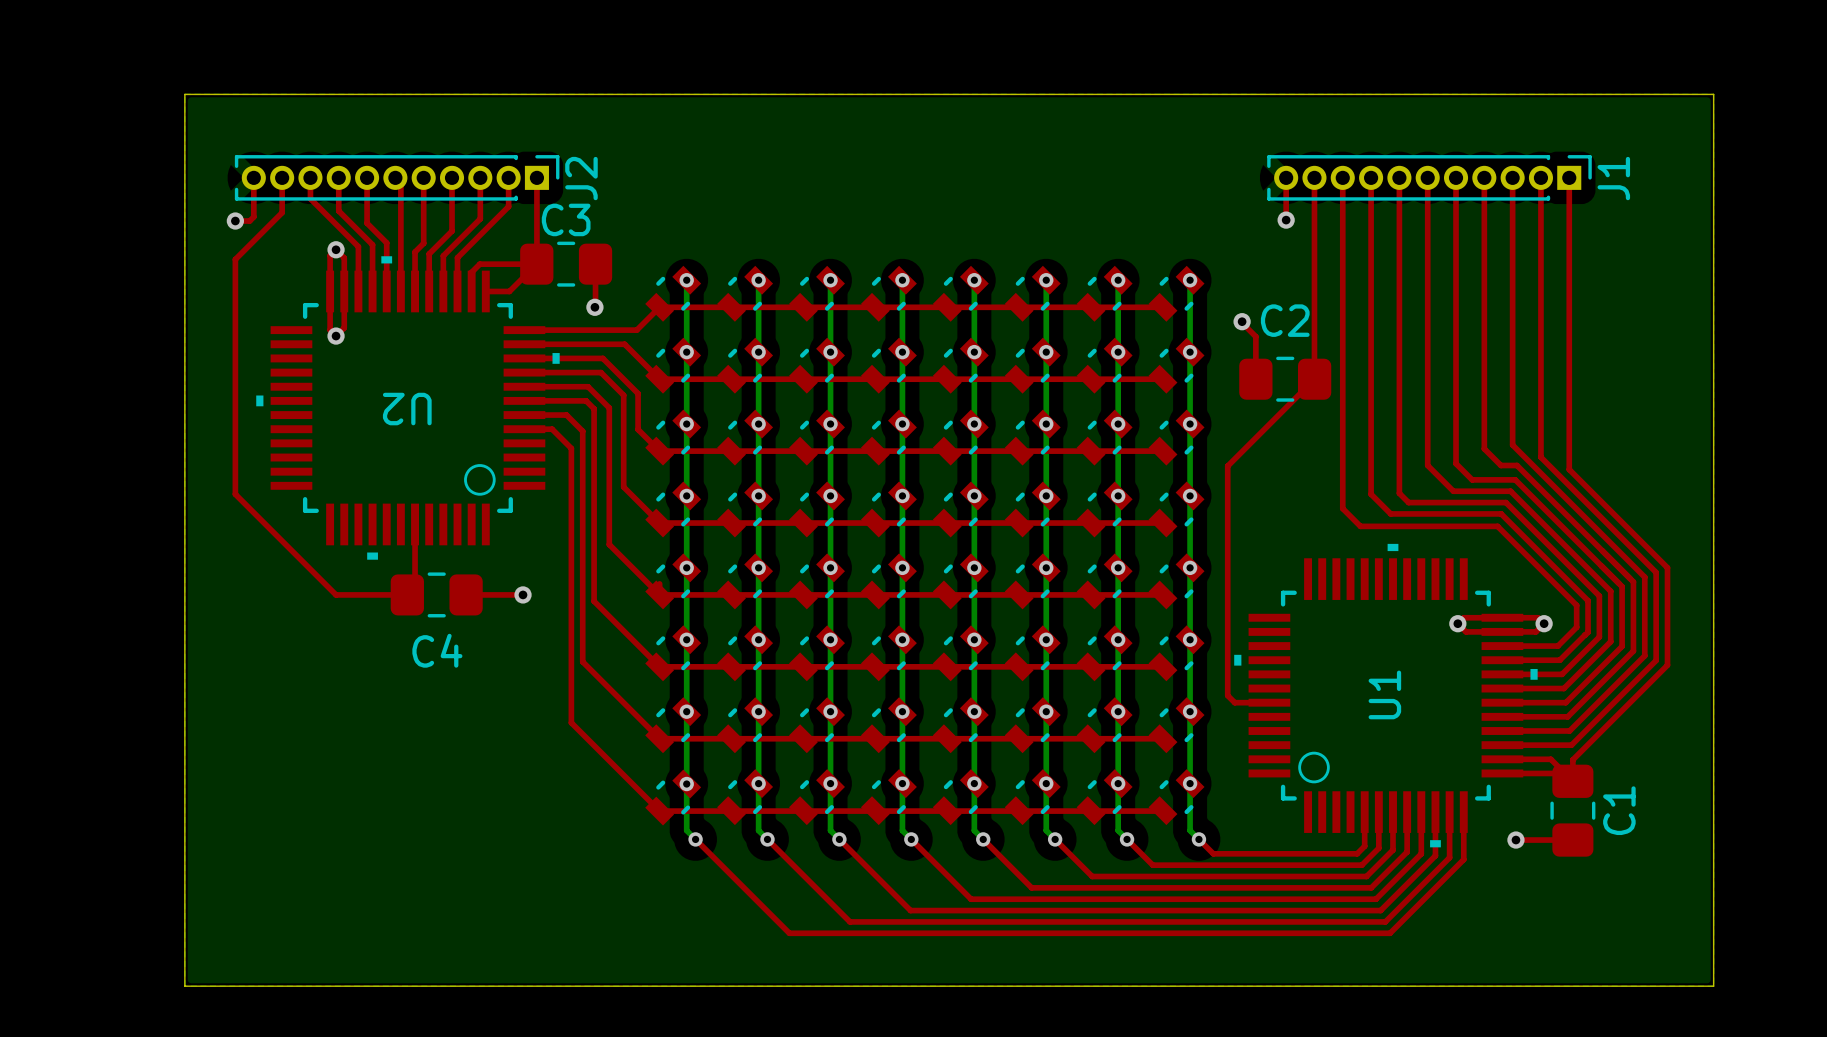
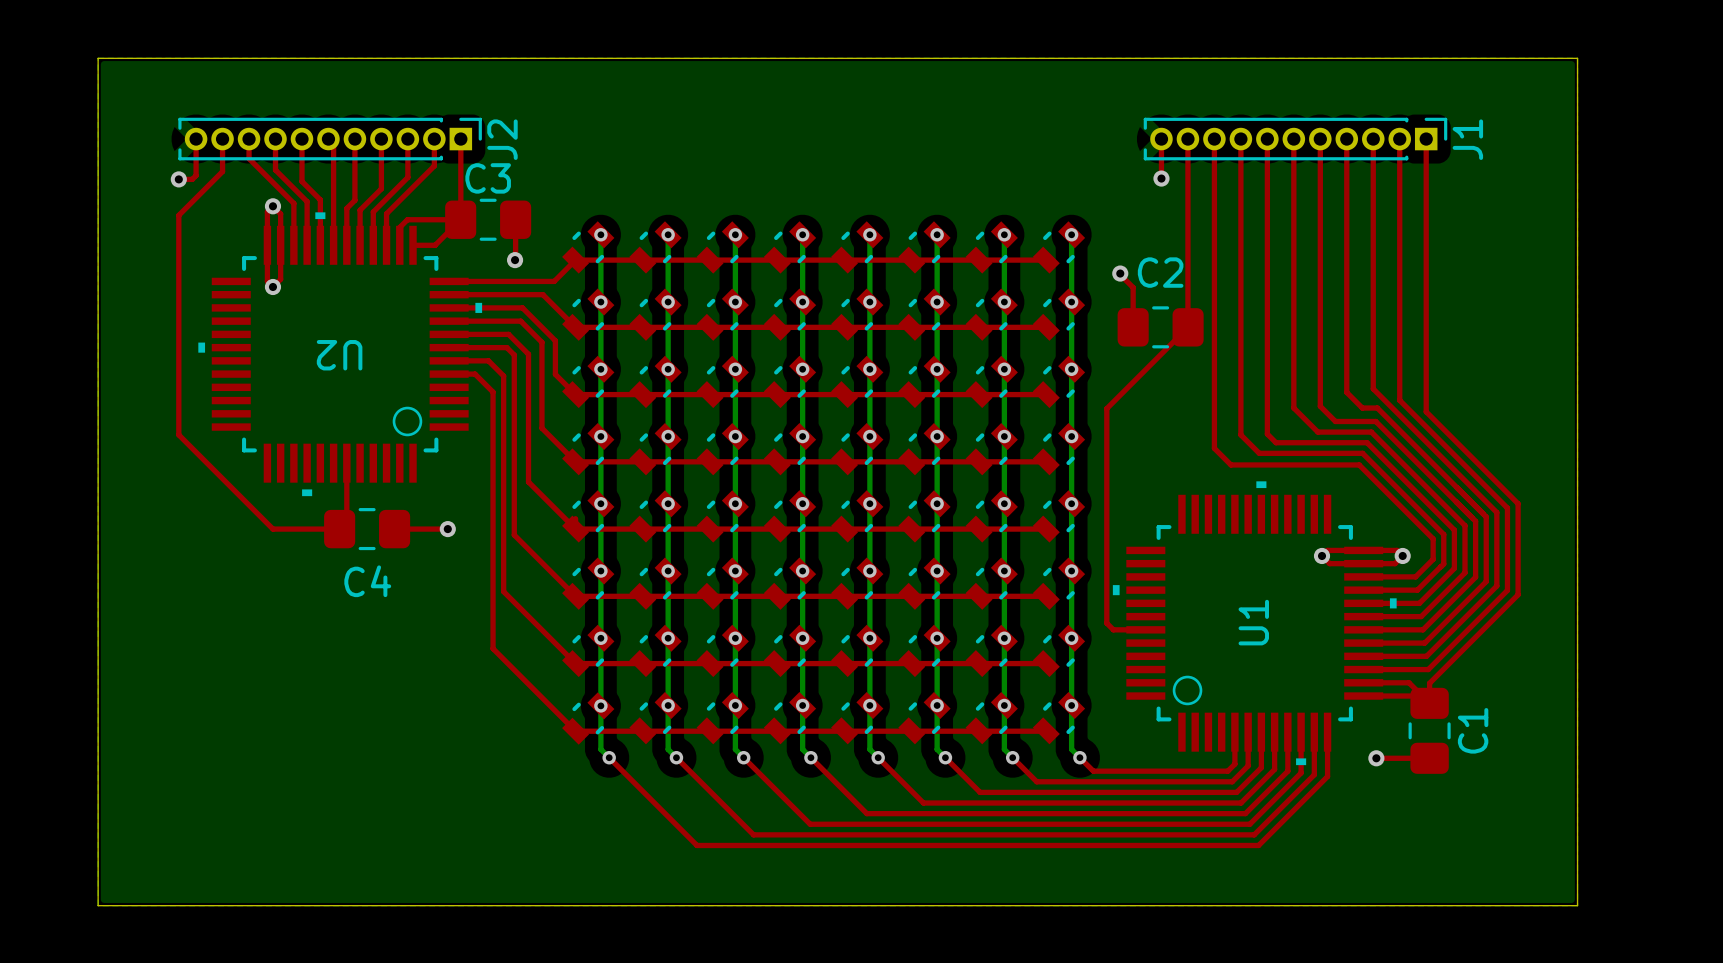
board edge: (184, 94) (1713, 94) (1713, 986) (184, 986) (184, 94) -> (98, 58) (98, 905) (1577, 905) (1577, 58) (98, 58)

